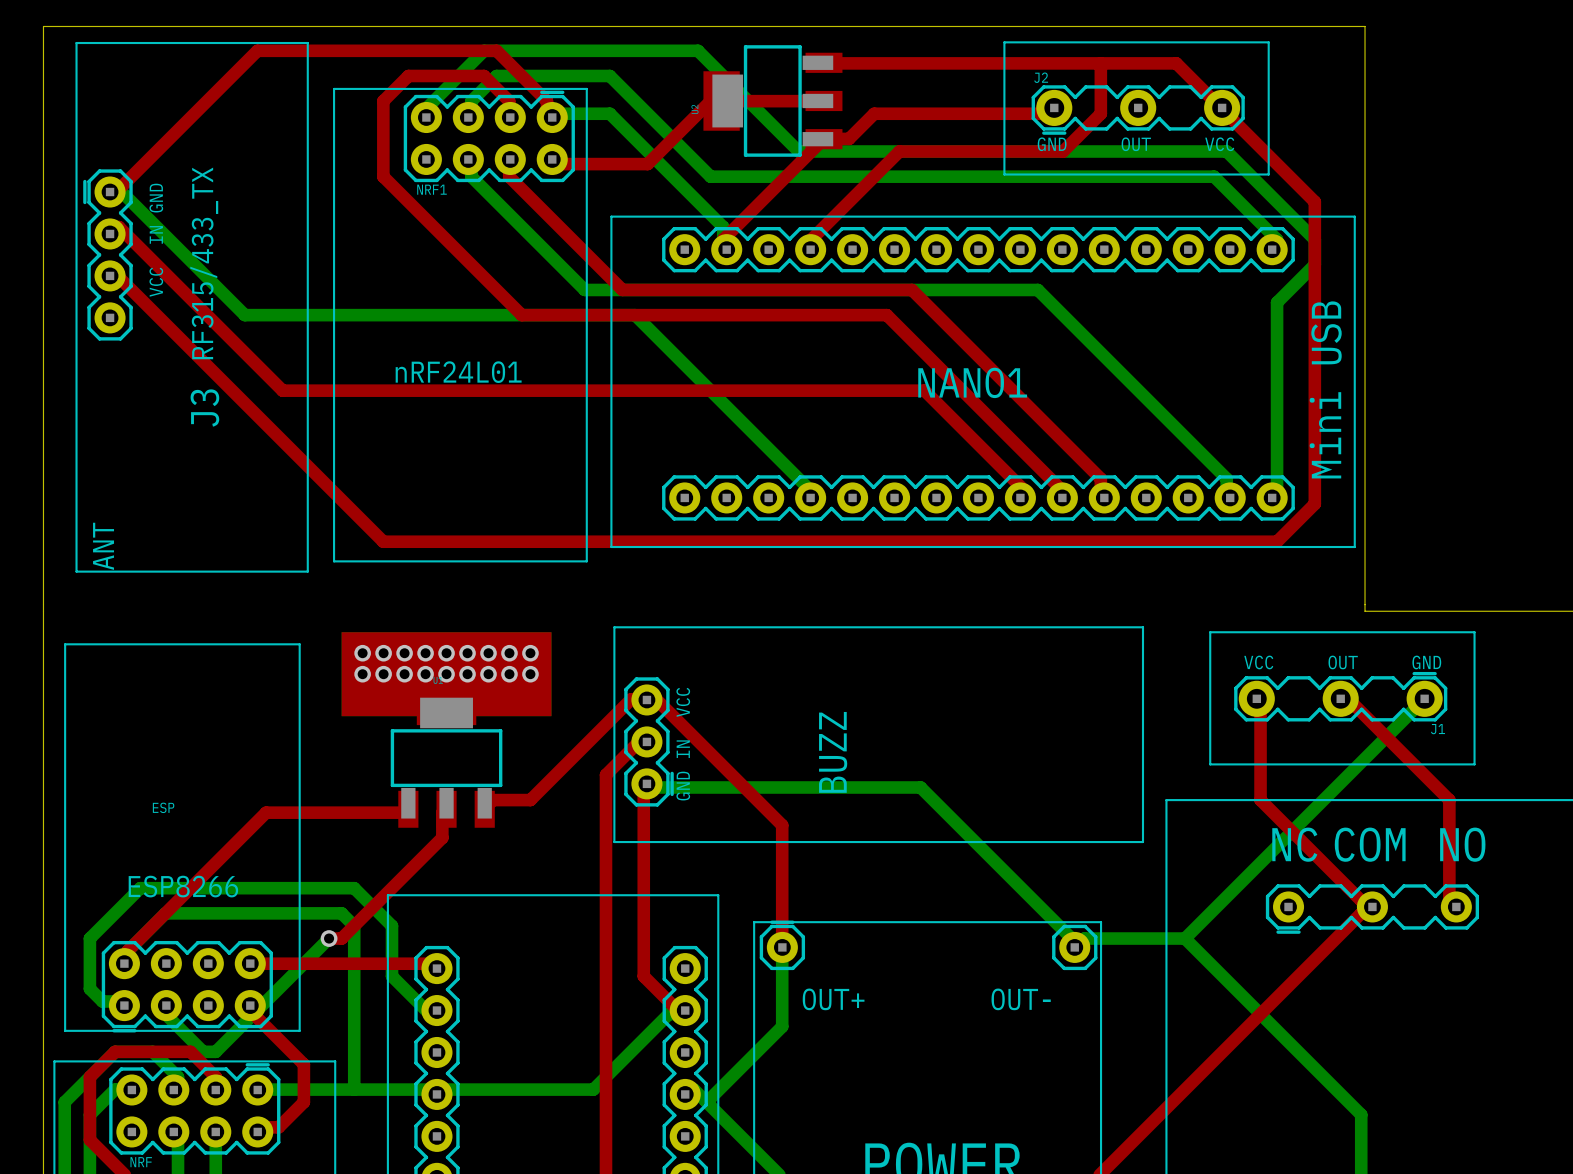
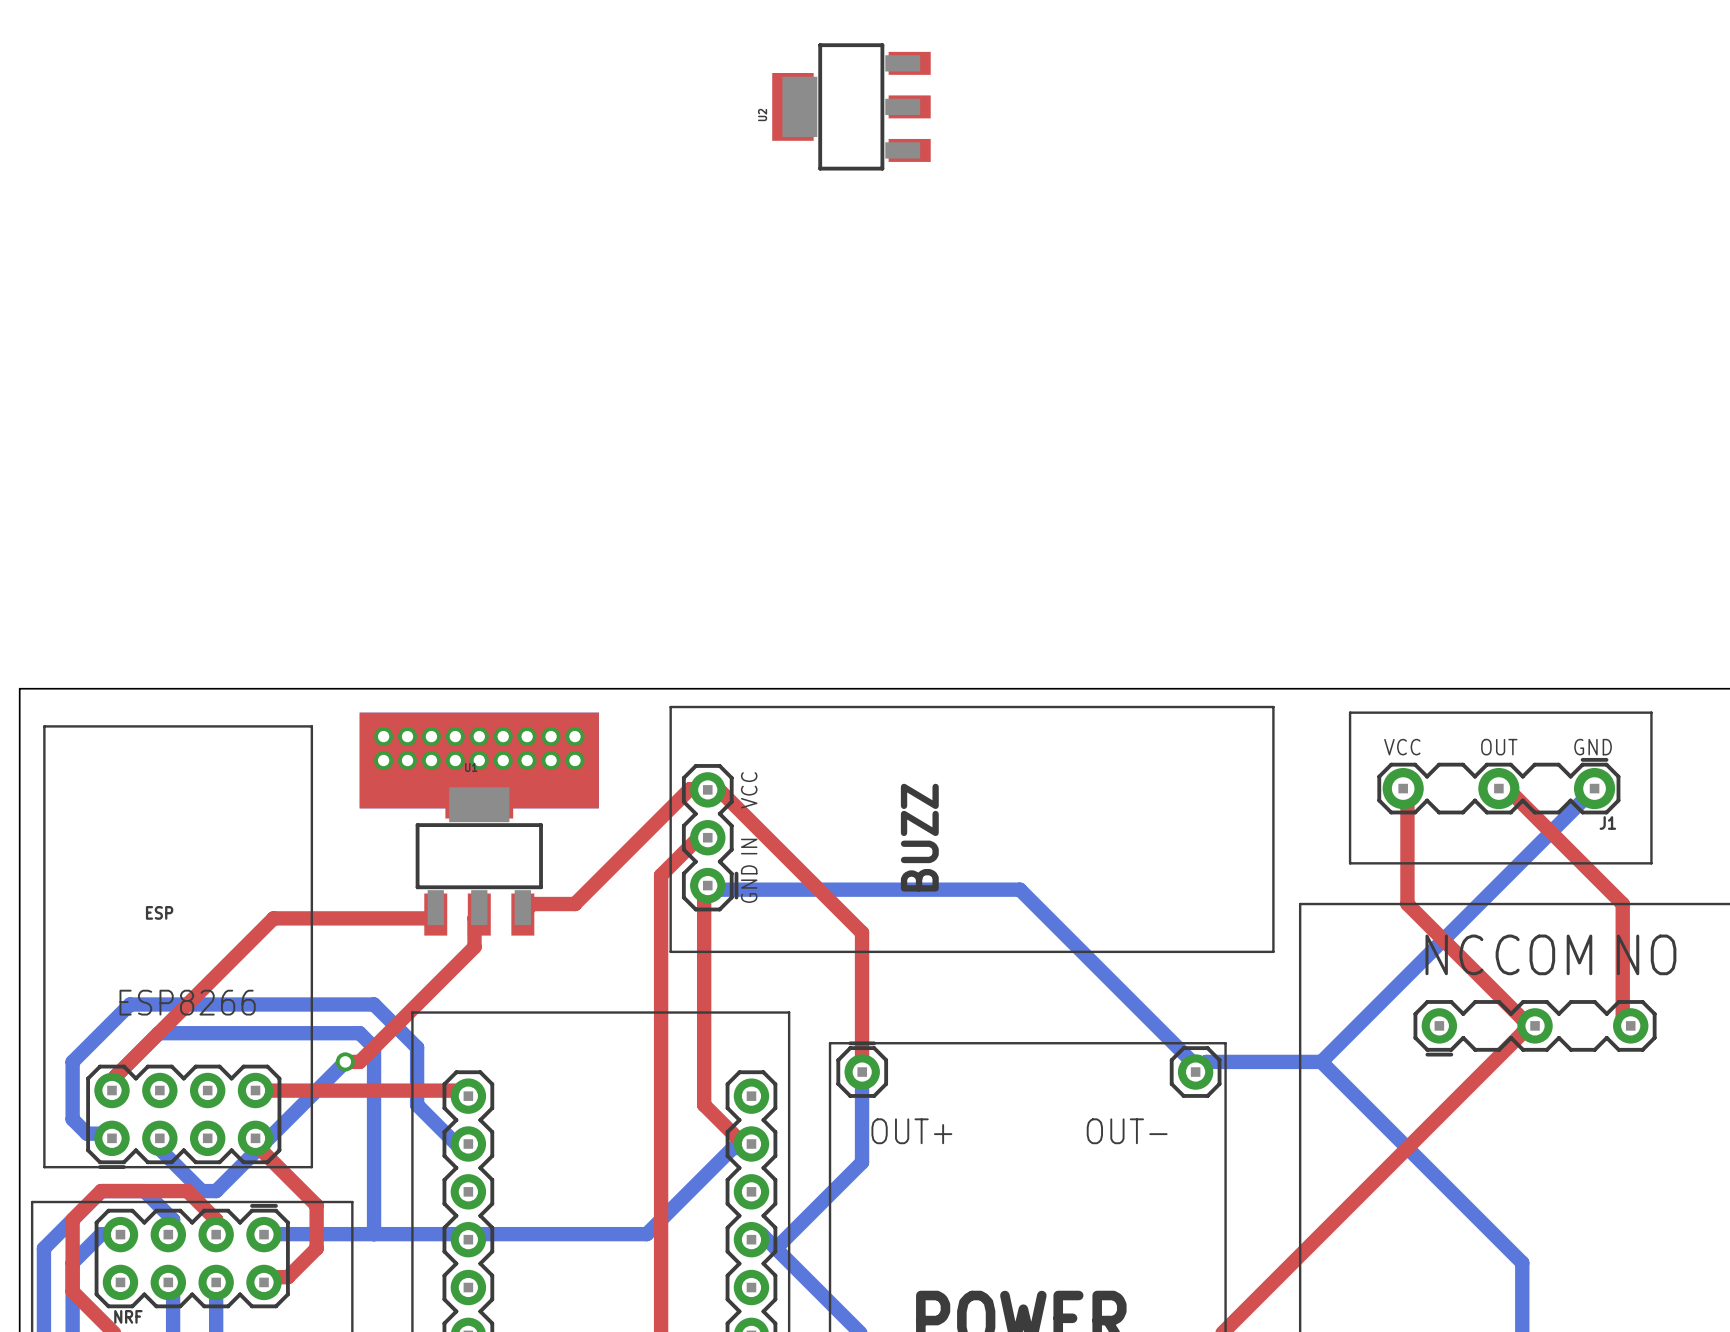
top track: (823, 62) (1176, 63) (1314, 201) (1314, 503) (1277, 541) (383, 541) (119, 277) (110, 275) -> none
top track: (1100, 63) (1100, 113) (1063, 151) (899, 151) (811, 239) (810, 249) -> none
top track: (823, 101) (710, 101) (647, 164) (559, 164) (552, 159) -> none
top track: (1054, 107) (1050, 113) (874, 113) (849, 138) (823, 139) -> none
J2: (1136, 108) -> none
bottom track: (426, 117) (421, 113) (484, 50) (698, 50) (798, 151) (1226, 151) (1314, 239) (1314, 264) (1277, 302) (1277, 491) (1272, 497) -> none
bottom track: (468, 117) (471, 113) (471, 101) (496, 75) (609, 75) (710, 176) (1214, 176) (1277, 239) (1272, 249) -> none
top track: (510, 117) (509, 101) (484, 75) (408, 75) (383, 101) (383, 176) (521, 315) (886, 315) (1063, 491) (1062, 497) -> none
top track: (552, 117) (546, 113) (546, 101) (496, 50) (257, 50) (119, 189) (110, 192) -> none
bottom track: (552, 117) (559, 113) (609, 113) (723, 227) (723, 239) (726, 249) -> none
top track: (823, 138) (723, 239) (726, 249) -> none
bottom track: (468, 159) (471, 164) (471, 176) (584, 289) (1037, 289) (1226, 478) (1226, 491) (1230, 497) -> none
top track: (510, 159) (509, 176) (622, 289) (912, 289) (1100, 478) (1100, 491) (1104, 497) -> none
bottom track: (110, 192) (119, 189) (244, 315) (635, 315) (811, 491) (810, 497) -> none
top track: (110, 233) (119, 227) (282, 390) (924, 390) (1025, 491) (1020, 497) -> none
J3: (192, 307) -> none
NRF1: (460, 325) -> none
NANO1: (983, 381) -> none
board edge: (43, 611) (43, 26) (1365, 26) (1365, 611) -> (19, 688) (1526, 688)

